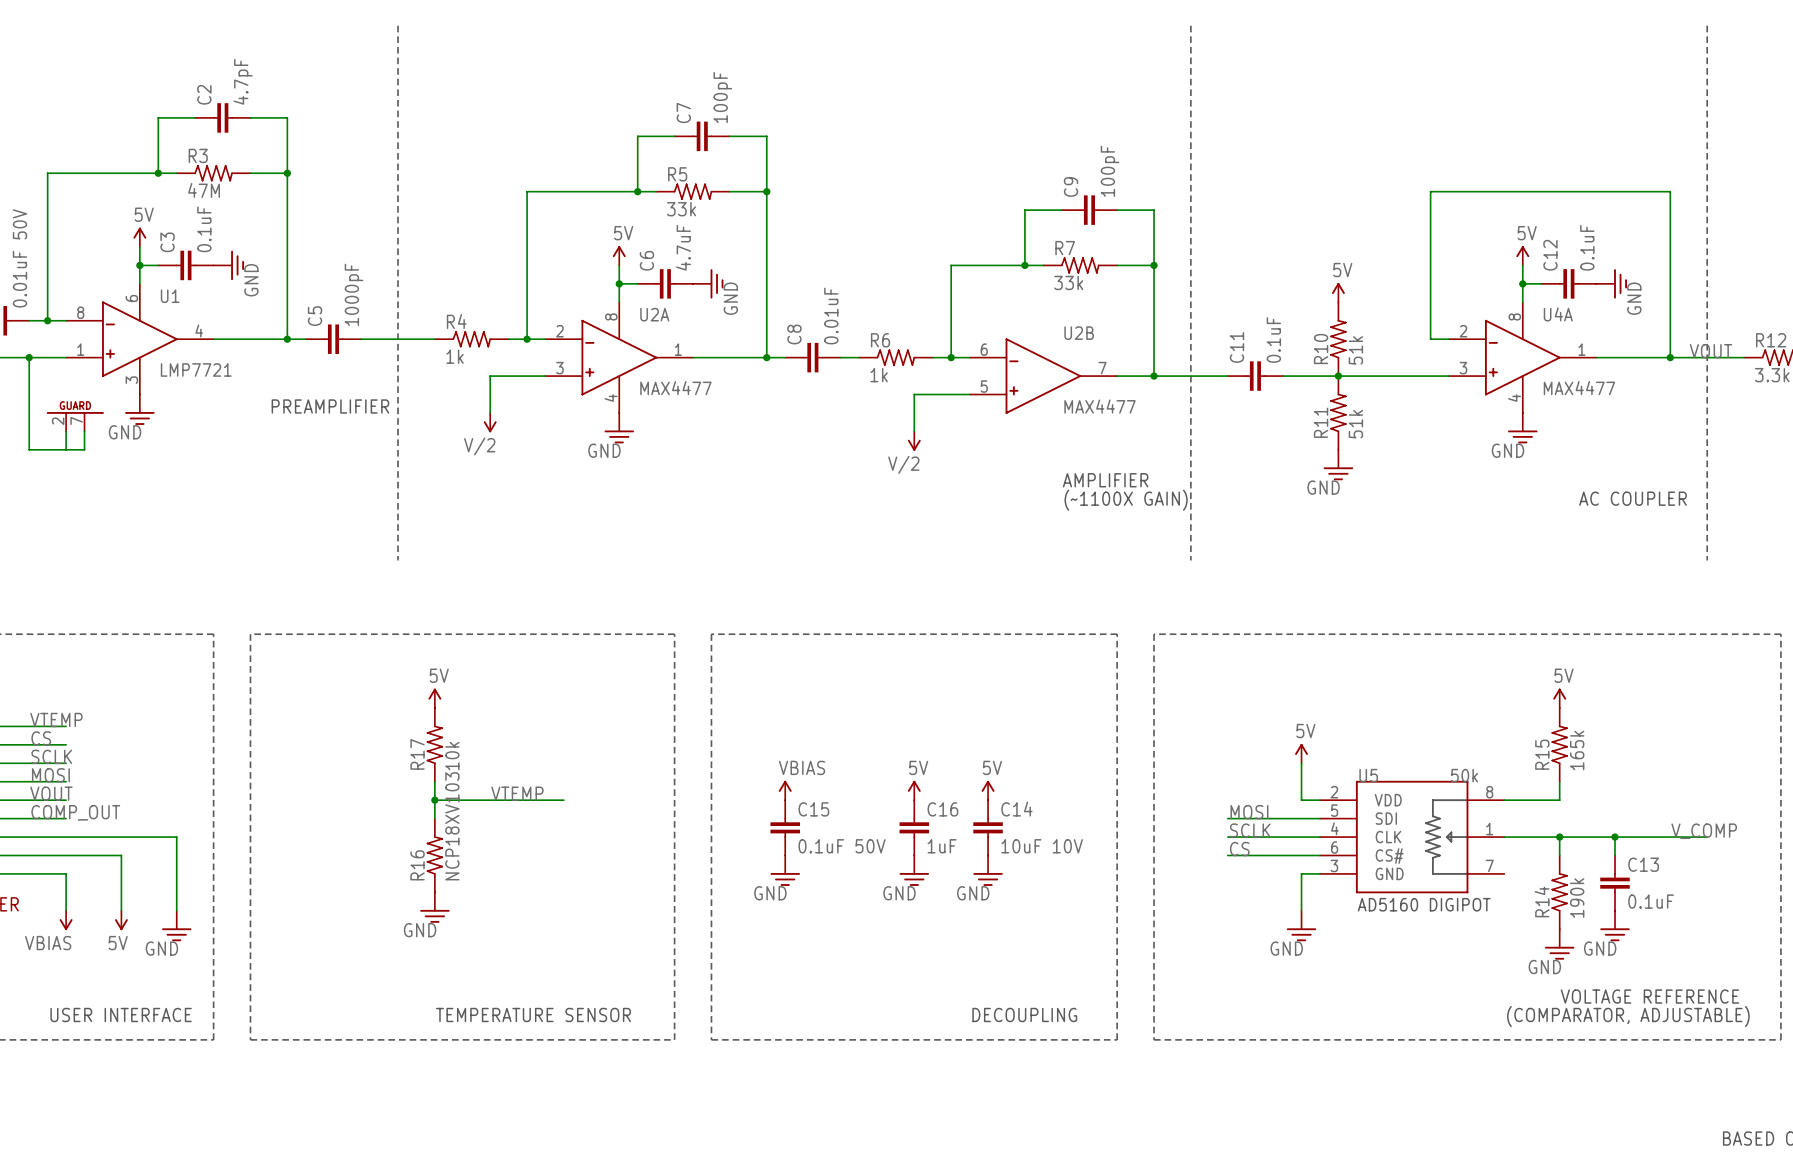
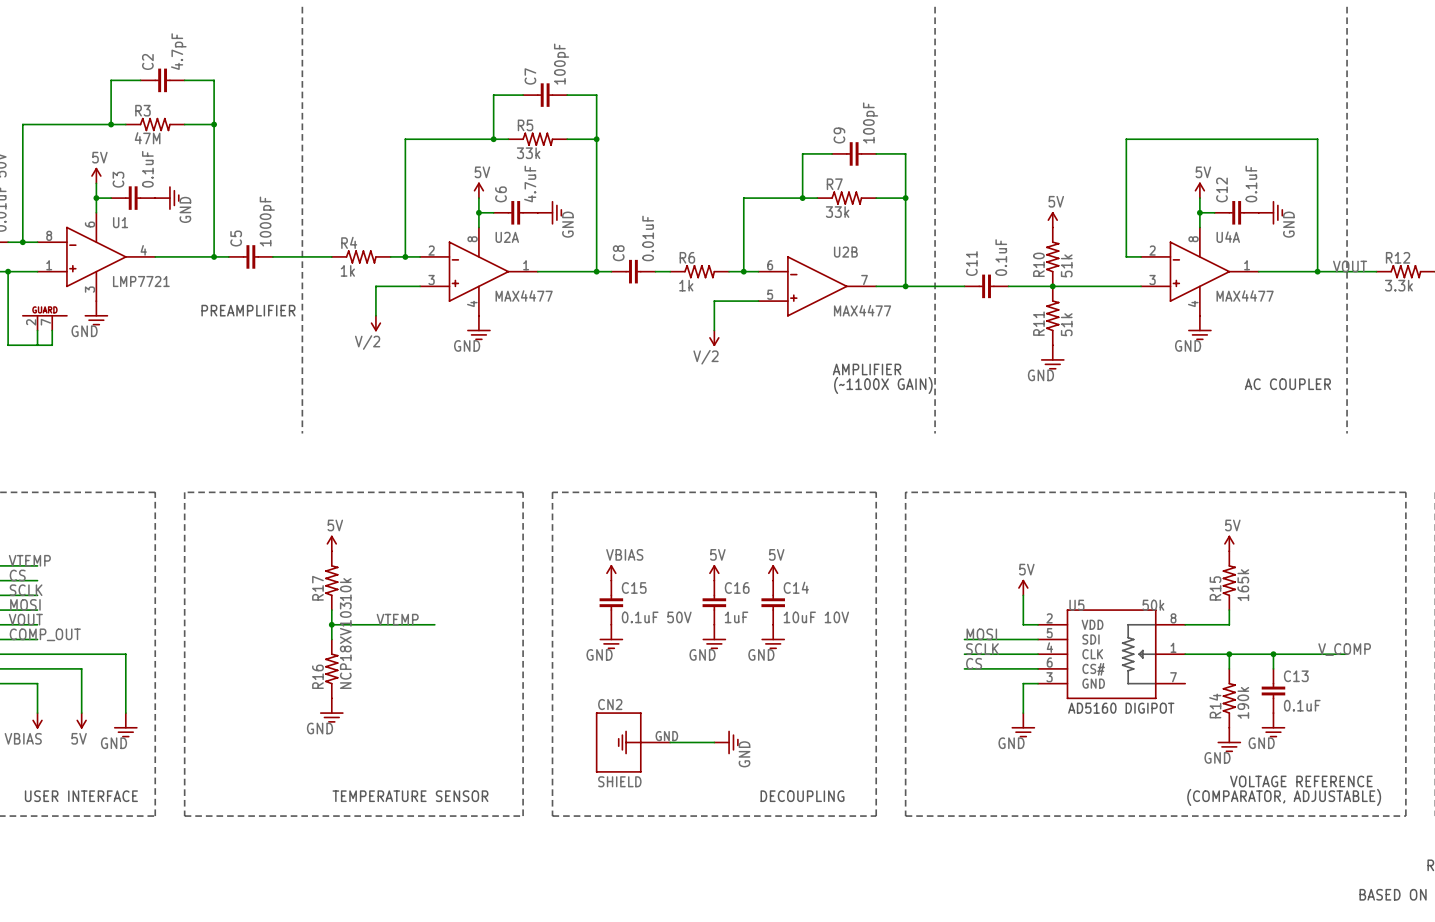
power symbol: none -> 5V (714, 572)
power symbol: none -> 5V (773, 572)
power symbol position: VBIAS (785, 790) -> VBIAS (611, 572)
power symbol: 5V (914, 790) -> none
power symbol: 5V (988, 790) -> none
power symbol: none -> GND (714, 636)
power symbol: none -> GND (773, 636)
C15 position: (785, 827) -> (611, 602)
C16 position: (914, 827) -> (714, 602)
C14 position: (988, 827) -> (773, 602)
power symbol position: GND (785, 870) -> GND (611, 636)
power symbol: GND (914, 870) -> none
power symbol: GND (988, 870) -> none
CN2: none -> (633, 742)
wire: none -> (670, 742) (714, 742)
power symbol: none -> GND (726, 742)

